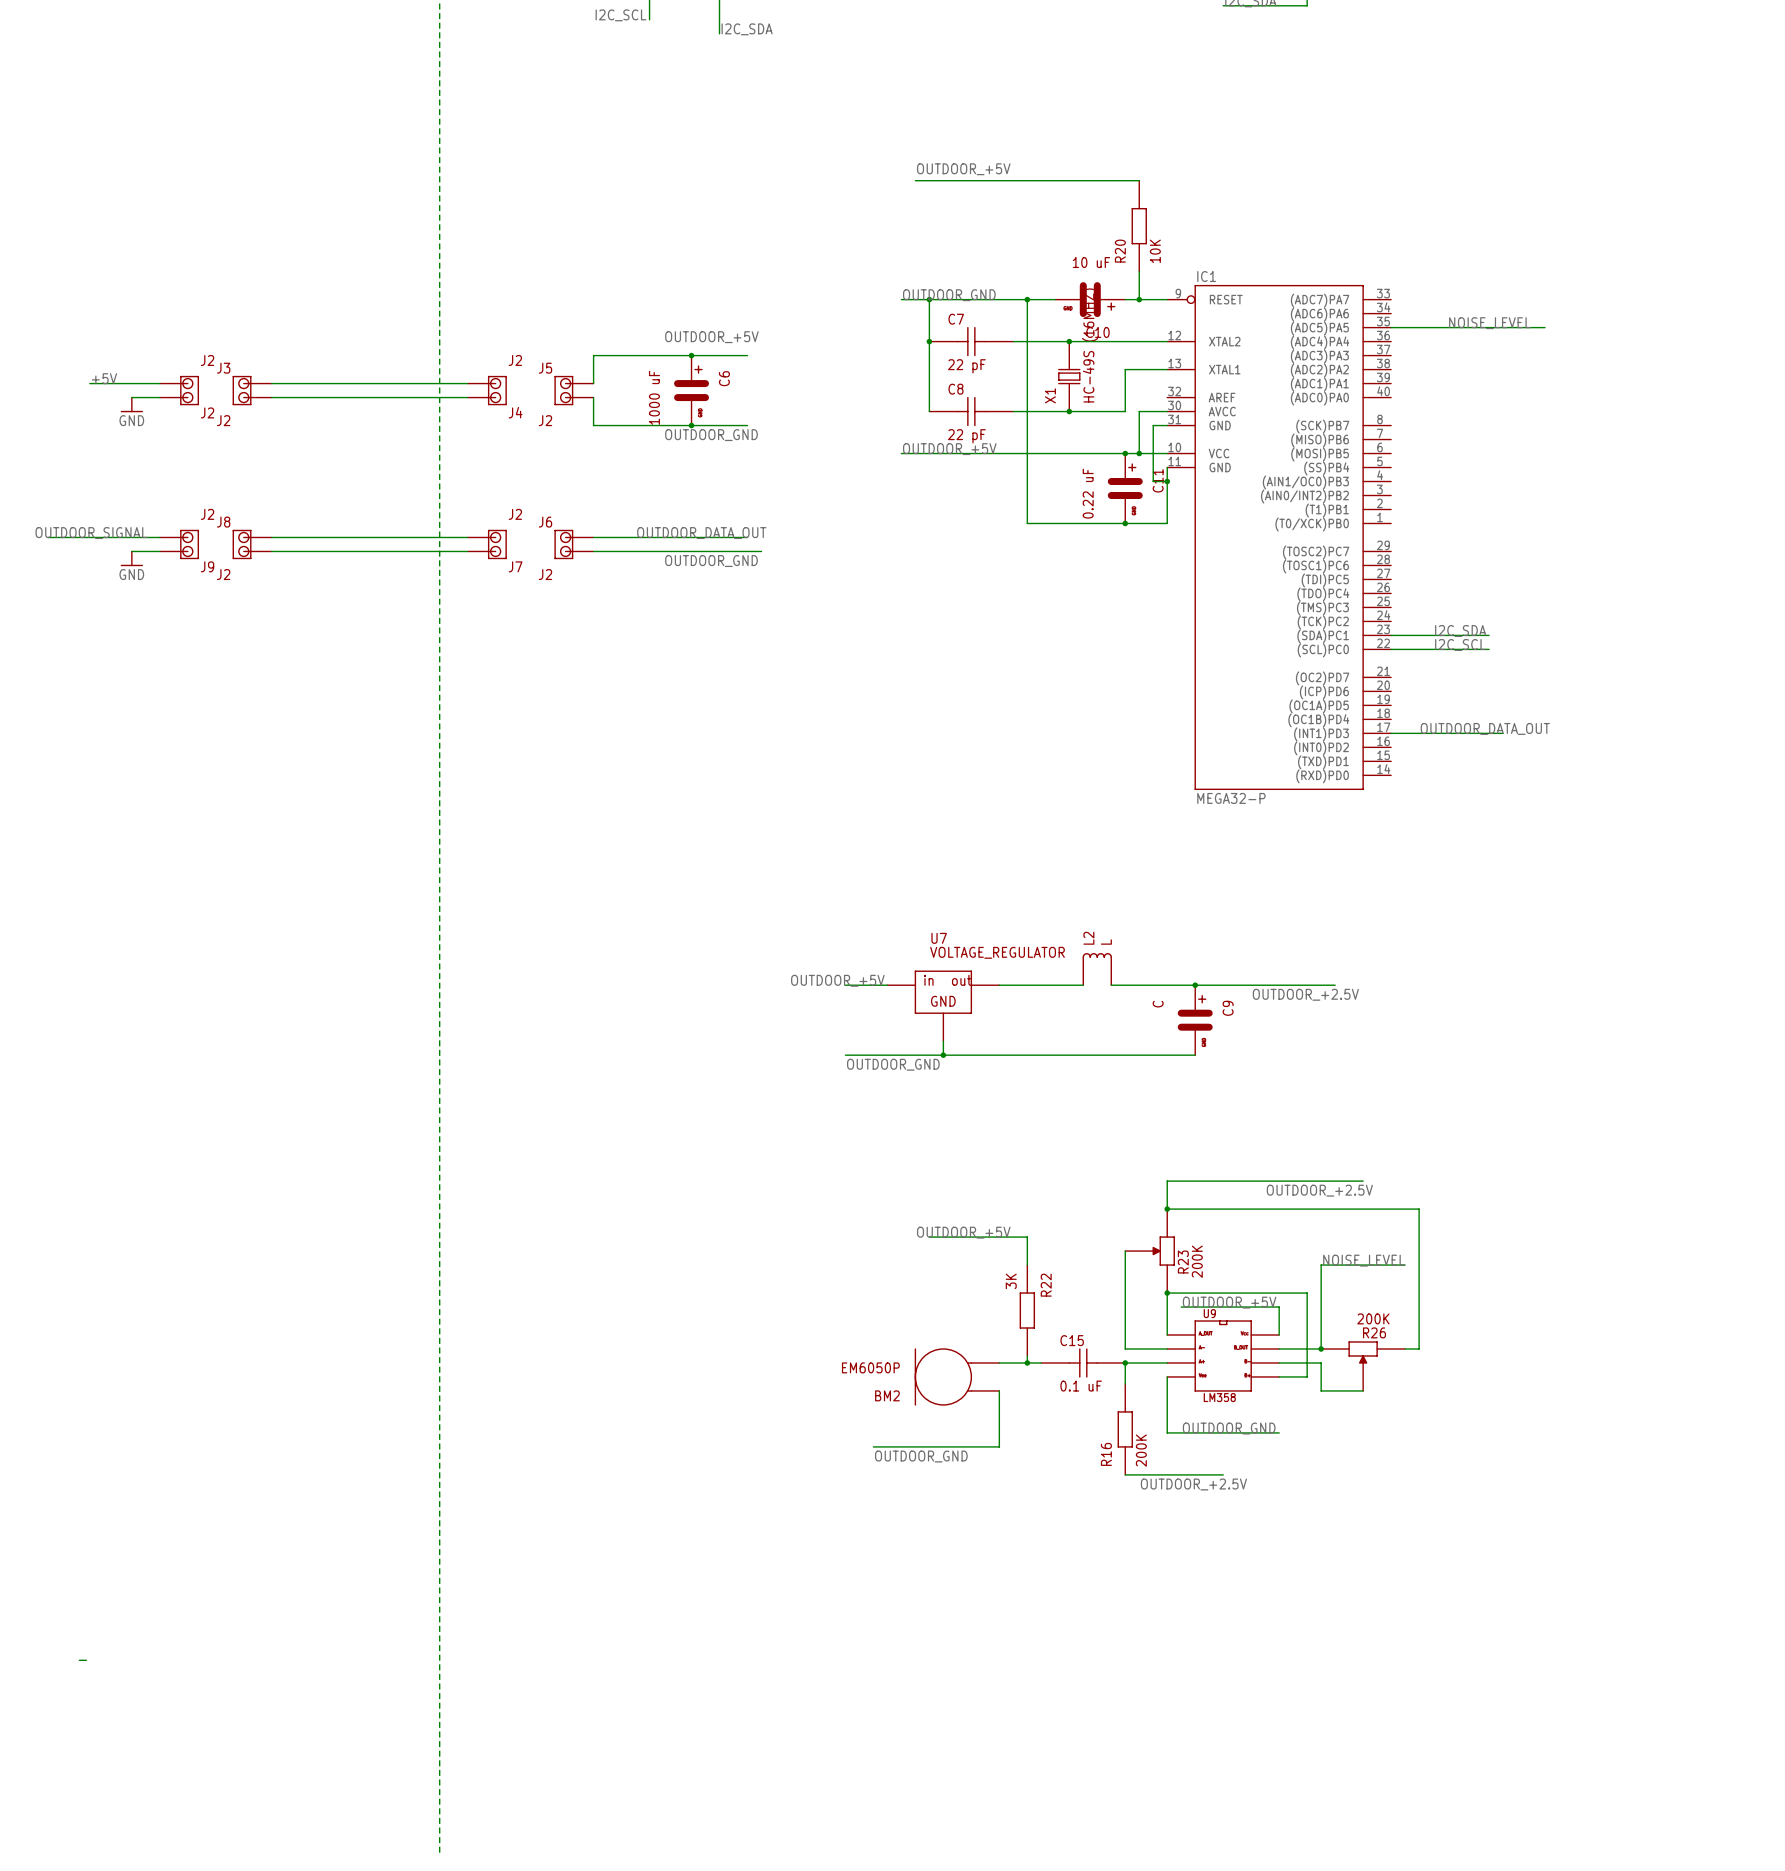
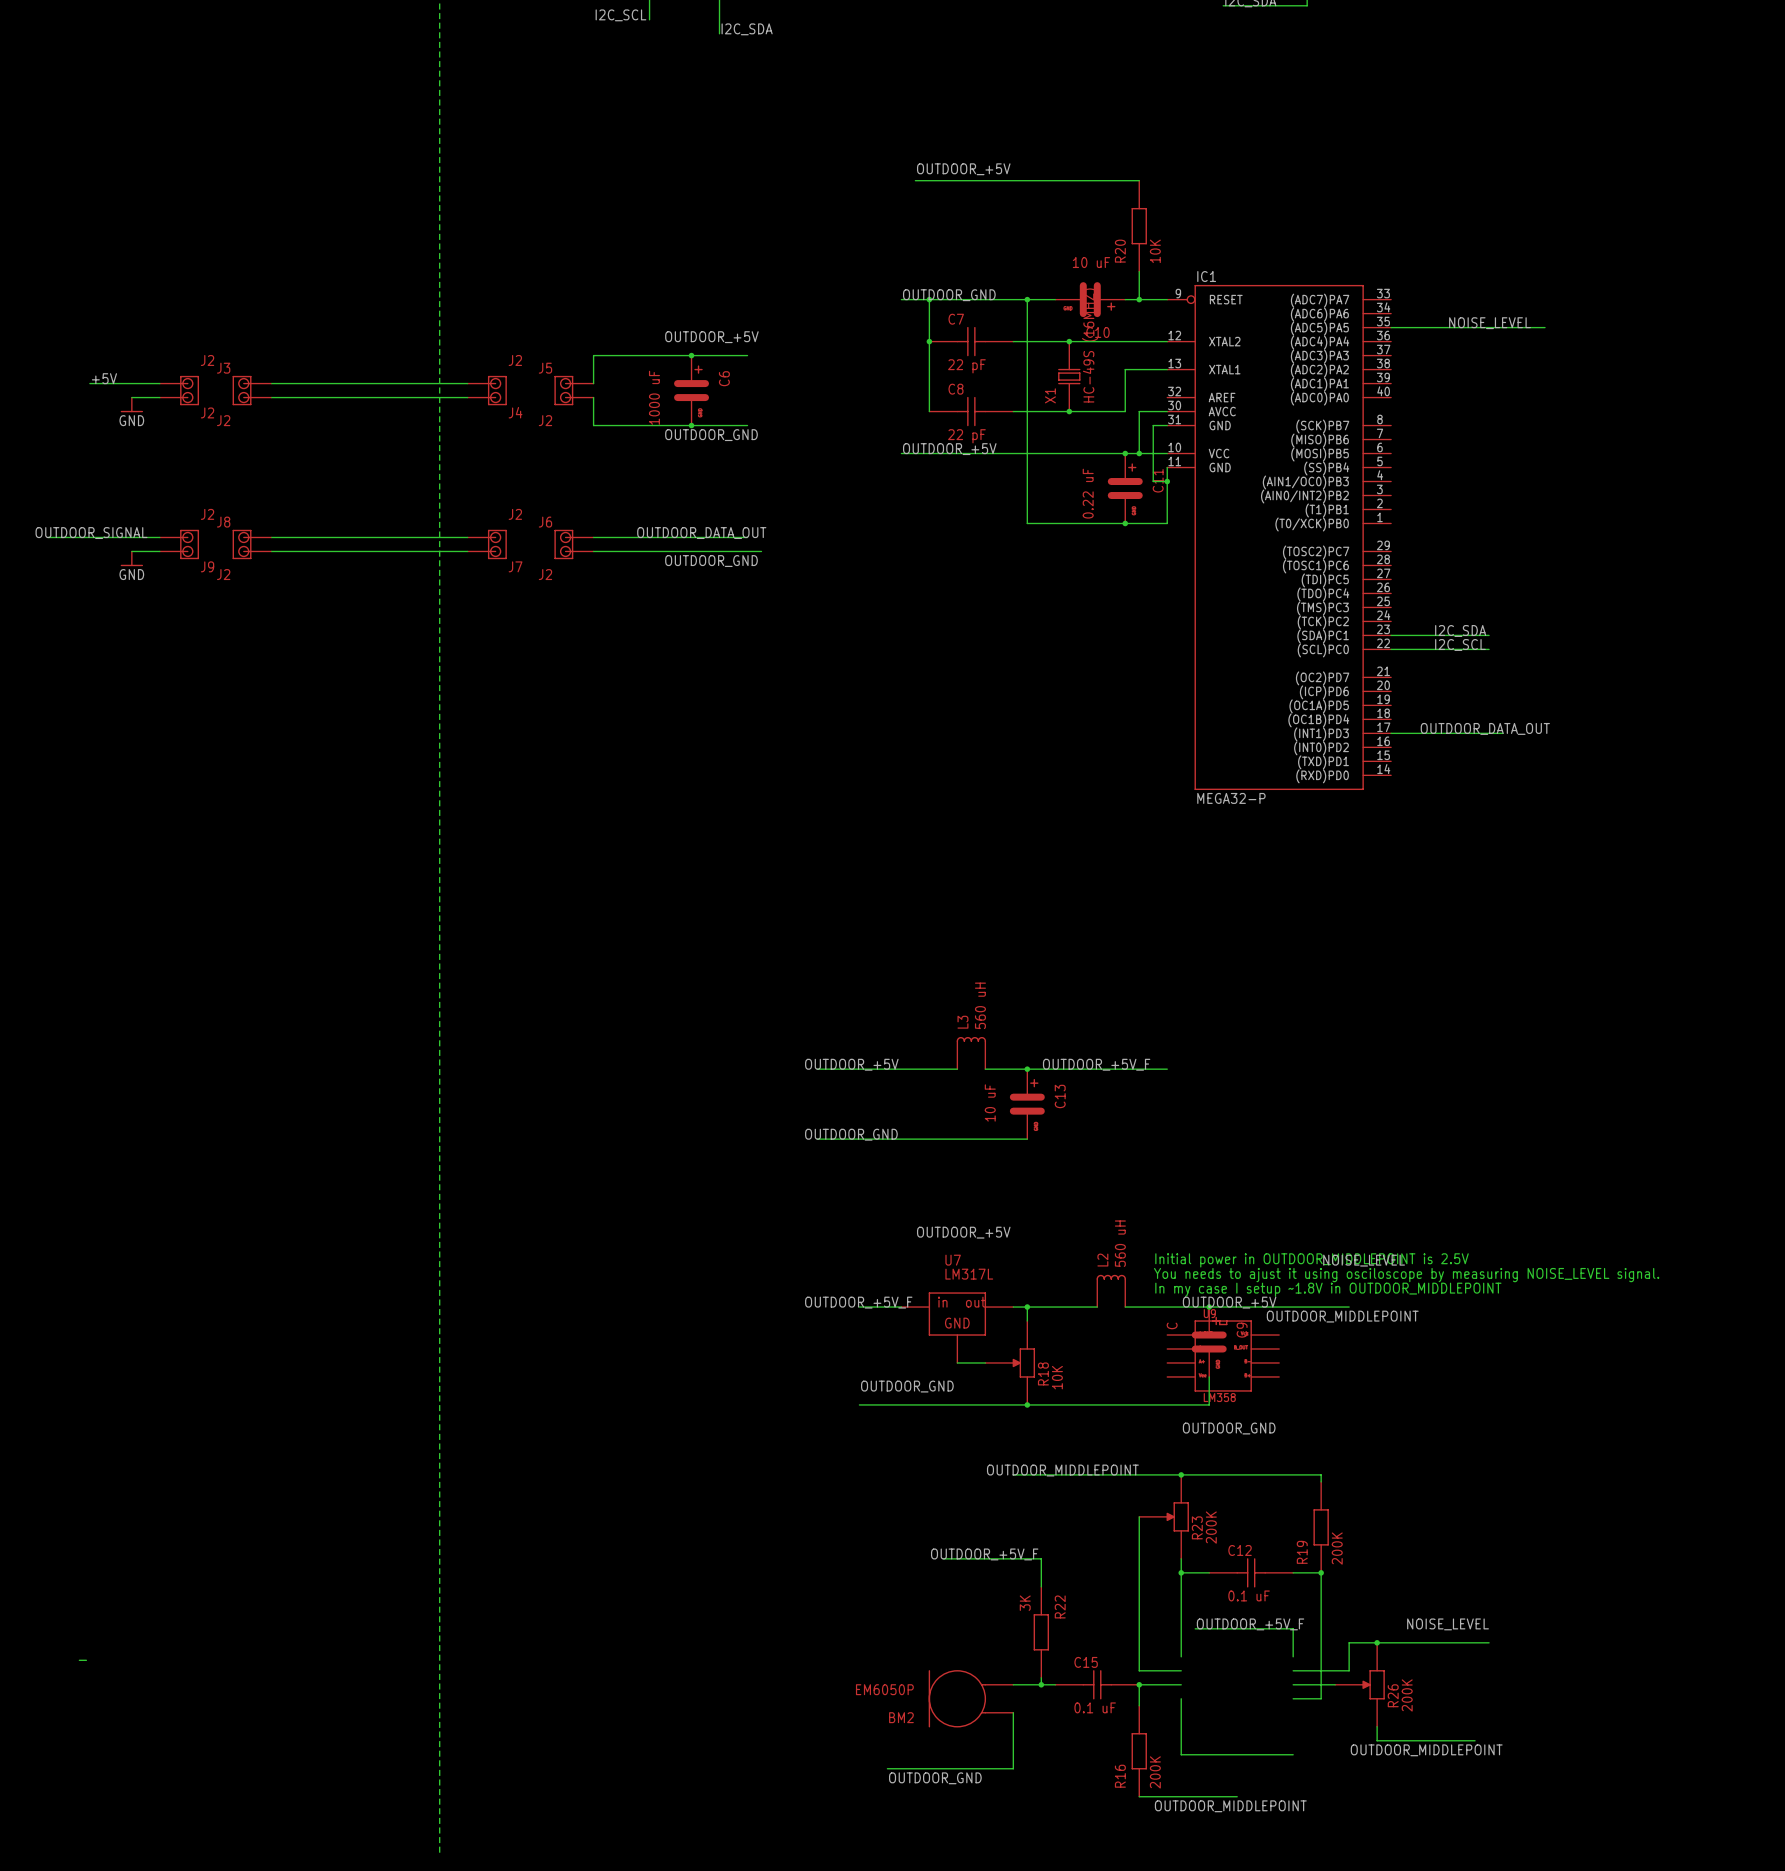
L2 value: L (1106, 942) -> 560 uH (1120, 1243)
U7 value: VOLTAGE_REGULATOR (997, 952) -> LM317L (969, 1274)
L2 position: (1097, 969) -> (1111, 1290)
label position: OUTDOOR_+5V (837, 980) -> OUTDOOR_+5V (851, 1064)
wire: (845, 985) (887, 985) -> none
wire: (999, 985) (1083, 985) -> none
wire: (1111, 985) (1335, 985) -> none
junction: (1195, 985) -> none
label: OUTDOOR_+2.5V (1305, 994) -> none
U7 position: (943, 1005) -> (957, 1327)
C9 position: (1195, 1020) -> (1209, 1342)
wire: (943, 1041) (943, 1055) -> none
L3: none -> 560 uH (971, 1053)
wire: (845, 1055) (1195, 1055) -> none
junction: (943, 1055) -> none
label position: OUTDOOR_GND (893, 1064) -> OUTDOOR_GND (851, 1134)
label: none -> OUTDOOR_+5V_F (1096, 1064)
wire: none -> (817, 1069) (957, 1069)
wire: none -> (985, 1069) (1167, 1069)
junction: none -> (1027, 1069)
C13: none -> 10 uF (1027, 1104)
wire: none -> (817, 1139) (1027, 1139)
wire: (1363, 1181) (1167, 1181) (1167, 1209) (1419, 1209) (1419, 1349) (1405, 1349) -> none
label: OUTDOOR_+2.5V (1319, 1190) -> none
junction: (1167, 1209) -> none
wire: (929, 1237) (1027, 1237) (1027, 1265) -> none
wire: (1125, 1251) (1125, 1349) (1167, 1349) -> none
R23 position: (1150, 1251) -> (1164, 1516)
text: none -> Initial power in OUTDOOR_MIDDLEPOINT is 2.5V (1312, 1260)
wire: (1405, 1265) (1321, 1265) (1321, 1349) (1279, 1349) -> none
text: none -> You needs to ajust it using osciloscope by measuring NOISE_LEVEL signal. (1406, 1275)
text: none -> In my case I setup ~1.8V in OUTDOOR_MIDDLEPOINT (1328, 1289)
junction: (1167, 1293) -> none
label: none -> OUTDOOR_+5V_F (858, 1302)
wire: none -> (859, 1307) (901, 1307)
wire: none -> (1013, 1307) (1097, 1307)
wire: none -> (1027, 1307) (1027, 1321)
junction: none -> (1027, 1307)
wire: none -> (1125, 1307) (1181, 1307)
junction: none -> (1209, 1307)
wire: (1279, 1307) (1279, 1335) -> (1279, 1307) (1349, 1307)
R22 position: (1027, 1310) -> (1041, 1632)
label: none -> OUTDOOR_MIDDLEPOINT (1342, 1316)
wire: (1167, 1335) (1167, 1293) (1307, 1293) (1307, 1376) (1279, 1376) -> none
junction: (1321, 1349) -> none
R26 rotation: 0° (1363, 1352) -> 90° clockwise (1373, 1684)
wire: (1027, 1355) (1027, 1362) -> none
R18: none -> 10K (1010, 1362)
junction: (1027, 1362) -> none
C15 position: (1083, 1362) -> (1097, 1684)
junction: (1125, 1362) -> none
wire: (1167, 1362) (1125, 1362) (1125, 1383) -> none
wire: (1279, 1362) (1321, 1362) (1321, 1390) (1363, 1390) -> none
R26 position: (1363, 1366) -> (1359, 1684)
BM2 position: (957, 1376) -> (971, 1698)
wire: (1167, 1376) (1167, 1432) (1279, 1432) -> none
wire: none -> (1209, 1376) (1209, 1404) (859, 1404)
wire: (999, 1390) (999, 1446) (873, 1446) -> none
junction: none -> (1027, 1404)
R16 position: (1125, 1429) -> (1139, 1751)
label position: OUTDOOR_GND (921, 1456) -> OUTDOOR_GND (907, 1386)
label: none -> OUTDOOR_MIDDLEPOINT (1062, 1470)
wire: none -> (1013, 1474) (1125, 1474)
junction: none -> (1181, 1474)
wire: none -> (1223, 1474) (1321, 1474) (1321, 1481)
label: OUTDOOR_+2.5V (1193, 1484) -> none
wire: none -> (1139, 1516) (1139, 1670) (1181, 1670)
R19: none -> 200K (1321, 1527)
label: none -> OUTDOOR_+5V_F (984, 1554)
wire: none -> (943, 1558) (1041, 1558) (1041, 1586)
wire: none -> (1181, 1558) (1181, 1656)
wire: none -> (1181, 1572) (1209, 1572)
junction: none -> (1181, 1572)
C12: none -> 0.1 uF (1251, 1572)
wire: none -> (1293, 1572) (1321, 1572) (1321, 1698) (1293, 1698)
junction: none -> (1321, 1572)
label: none -> OUTDOOR_+5V_F (1250, 1624)
label: none -> NOISE_LEVEL (1448, 1624)
wire: none -> (1195, 1628) (1293, 1628) (1293, 1656)
junction: none -> (1377, 1642)
wire: none -> (1489, 1642) (1349, 1642) (1349, 1670) (1293, 1670)
wire: none -> (1041, 1677) (1041, 1684)
wire: none -> (1013, 1684) (1055, 1684)
junction: none -> (1041, 1684)
junction: none -> (1139, 1684)
wire: none -> (1181, 1684) (1139, 1684) (1139, 1705)
wire: none -> (1293, 1684) (1335, 1684)
wire: none -> (1181, 1698) (1181, 1754) (1293, 1754)
wire: none -> (1013, 1712) (1013, 1768) (887, 1768)
wire: none -> (1377, 1726) (1377, 1740) (1475, 1740)
label: none -> OUTDOOR_MIDDLEPOINT (1426, 1750)
label: none -> OUTDOOR_GND (935, 1778)
wire: none -> (1139, 1796) (1237, 1796)
label: none -> OUTDOOR_MIDDLEPOINT (1230, 1806)

